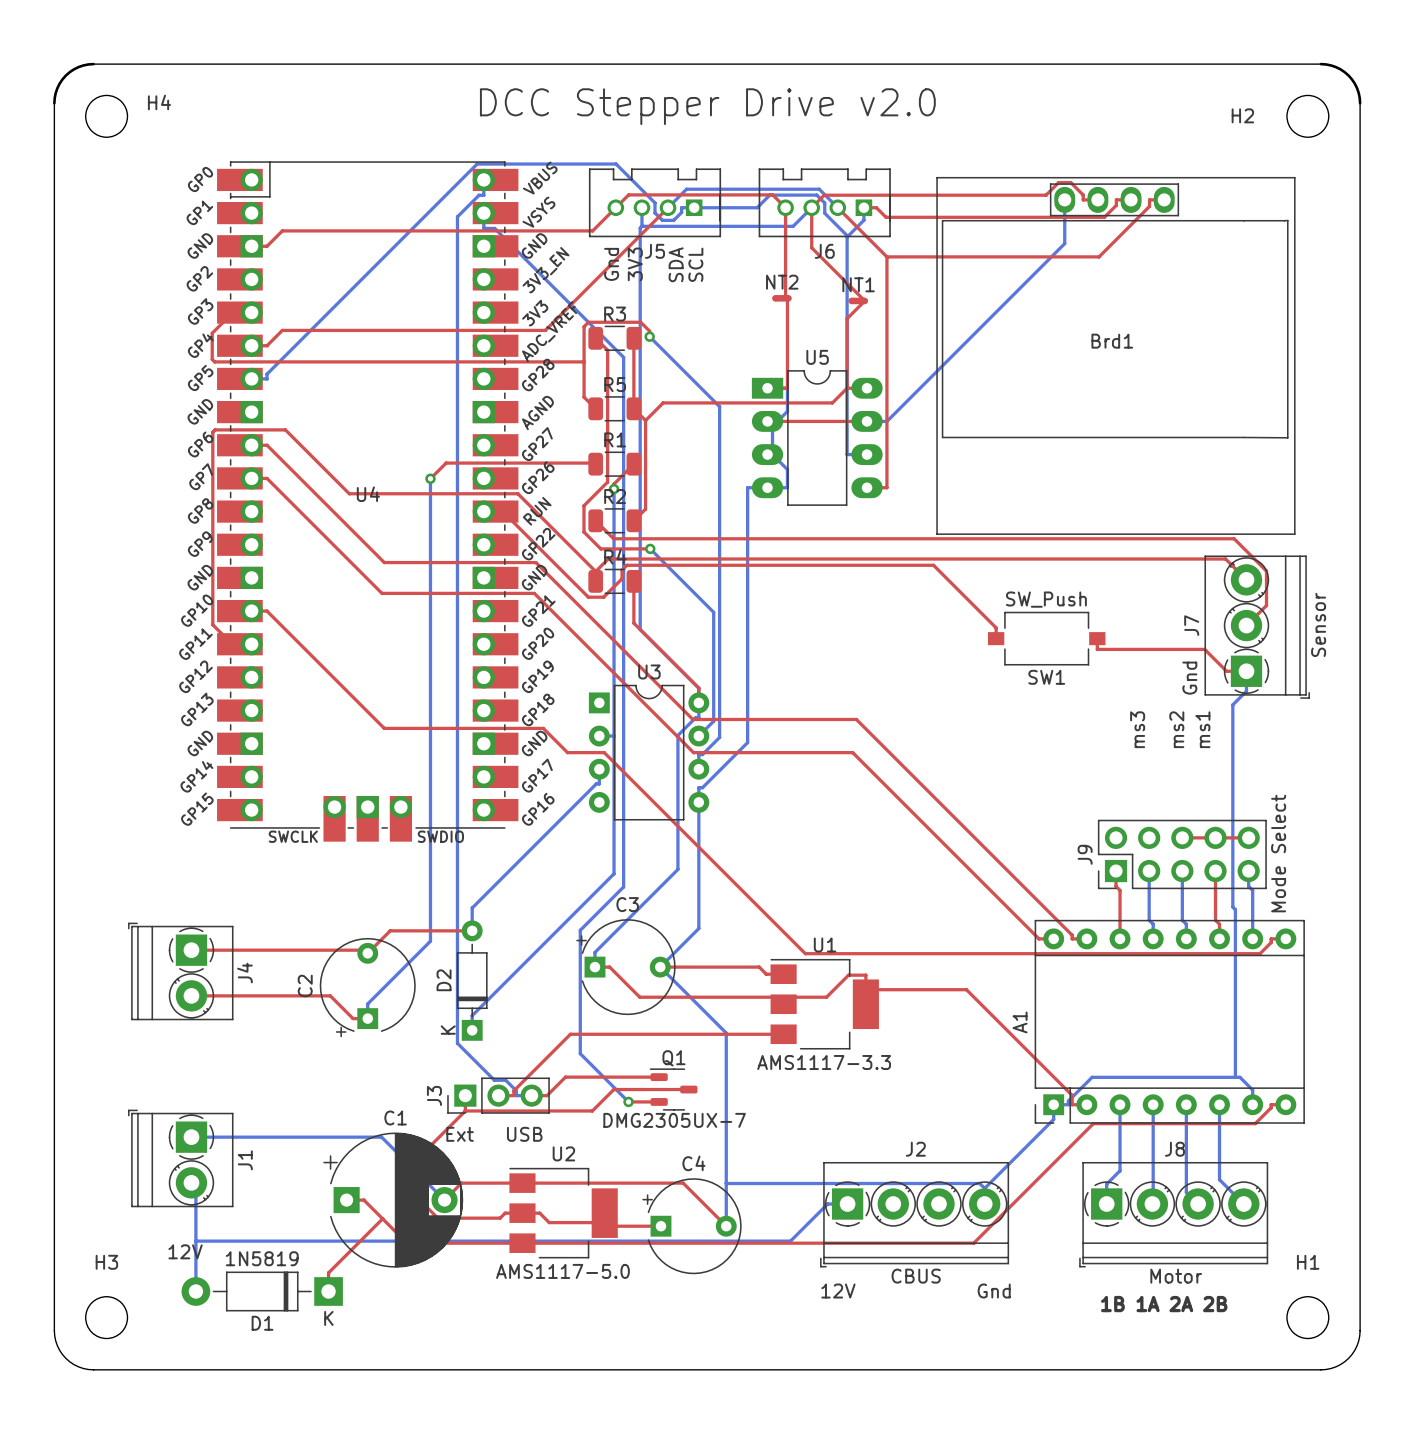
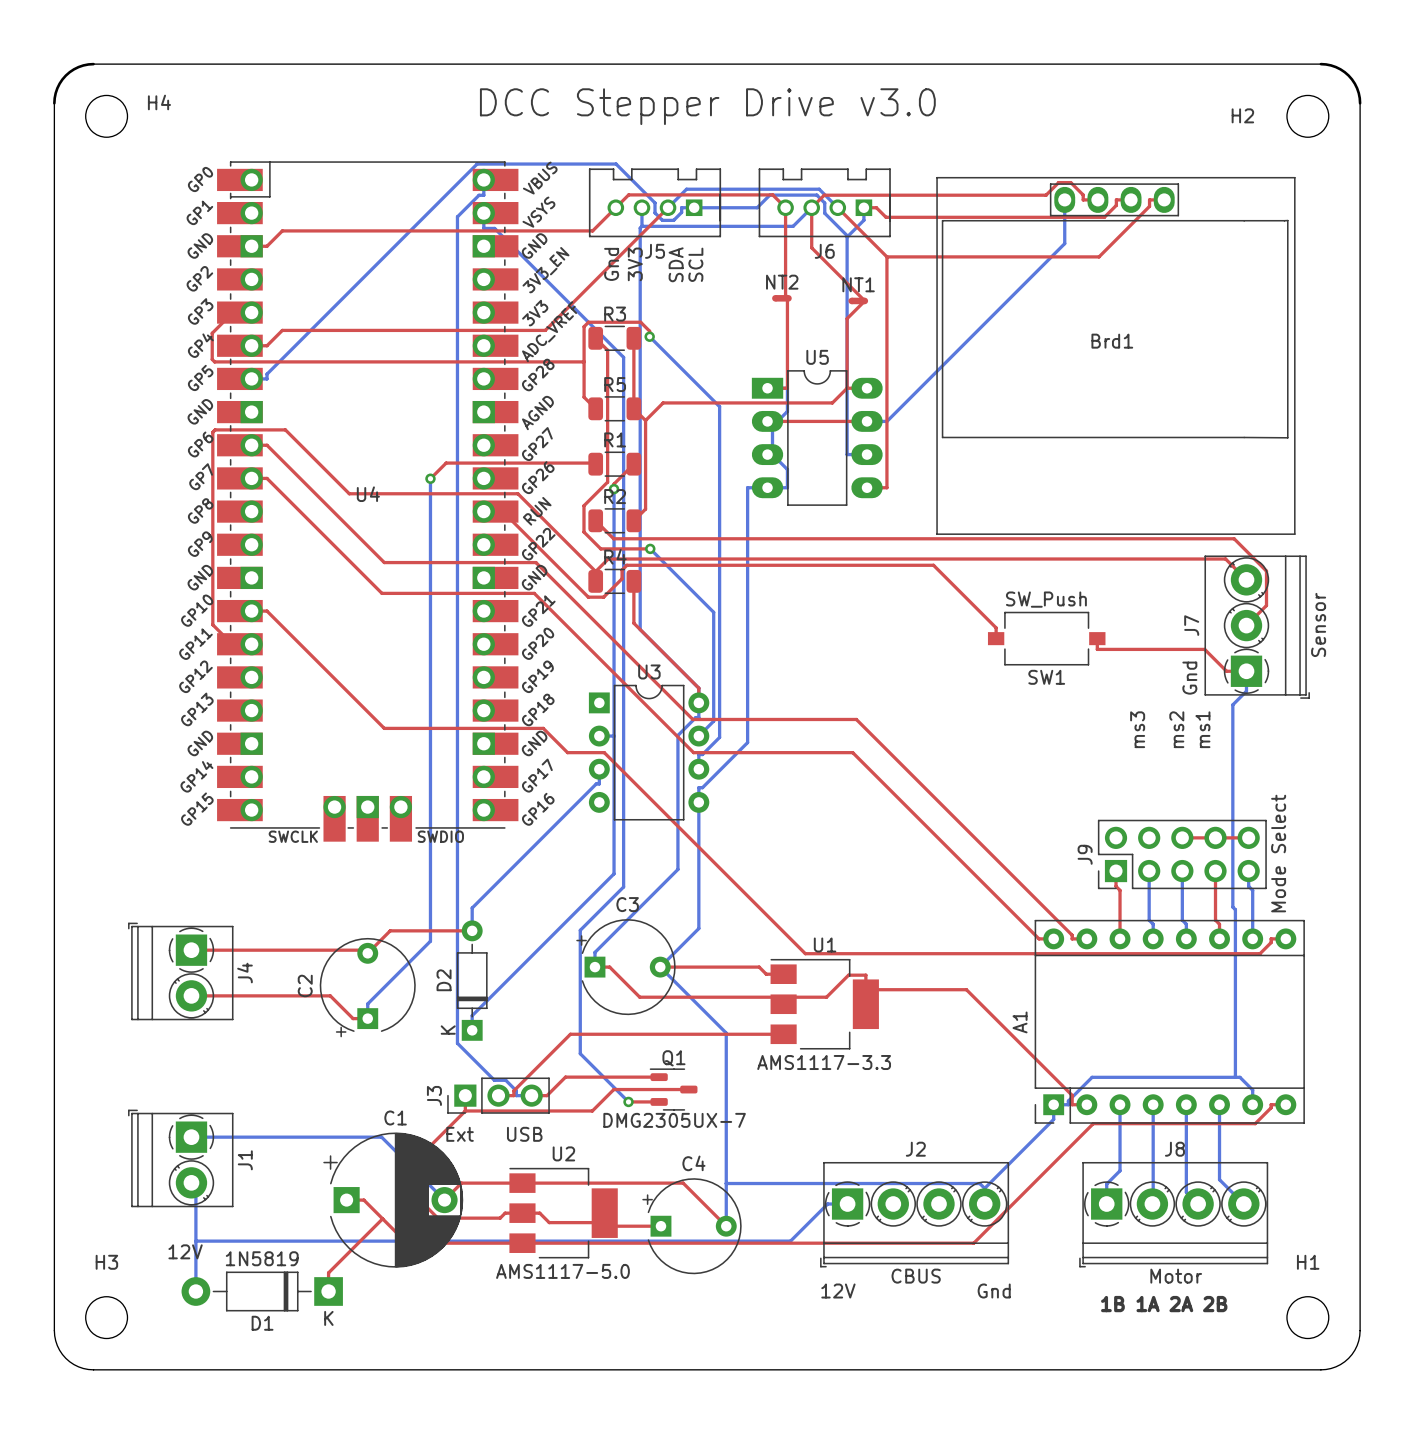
text: DCC Stepper Drive v2.0 (707, 106) -> DCC Stepper Drive v3.0 (707, 106)

